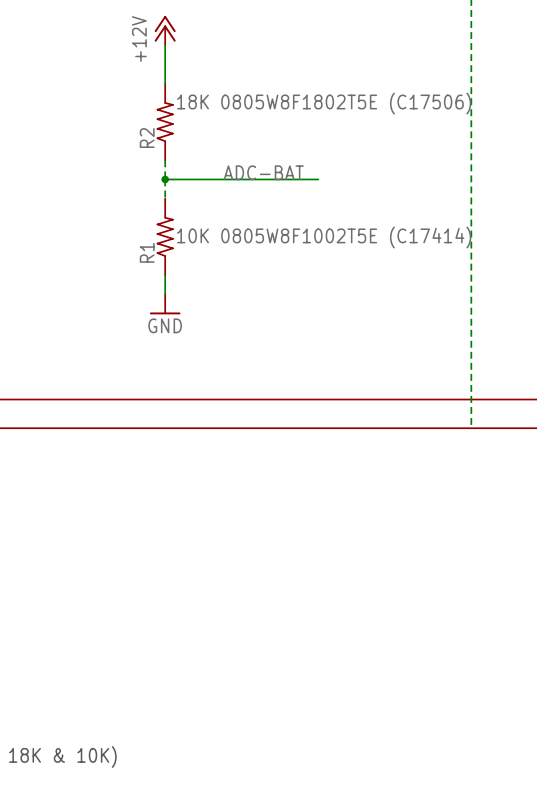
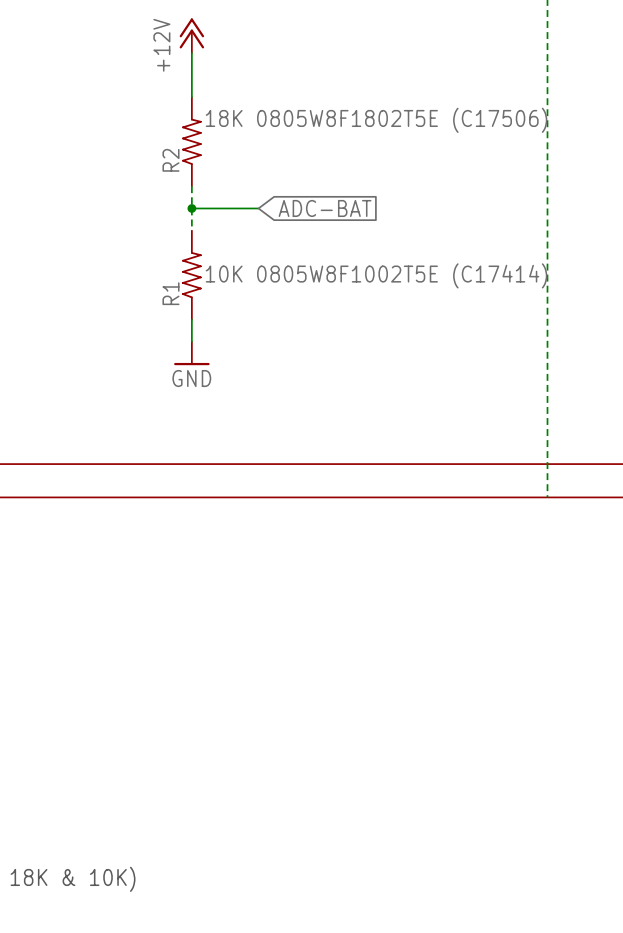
label: ADC-BAT (263, 172) -> none
wire: (222, 179) (318, 179) -> none
global label: none -> ADC-BAT (325, 208)

